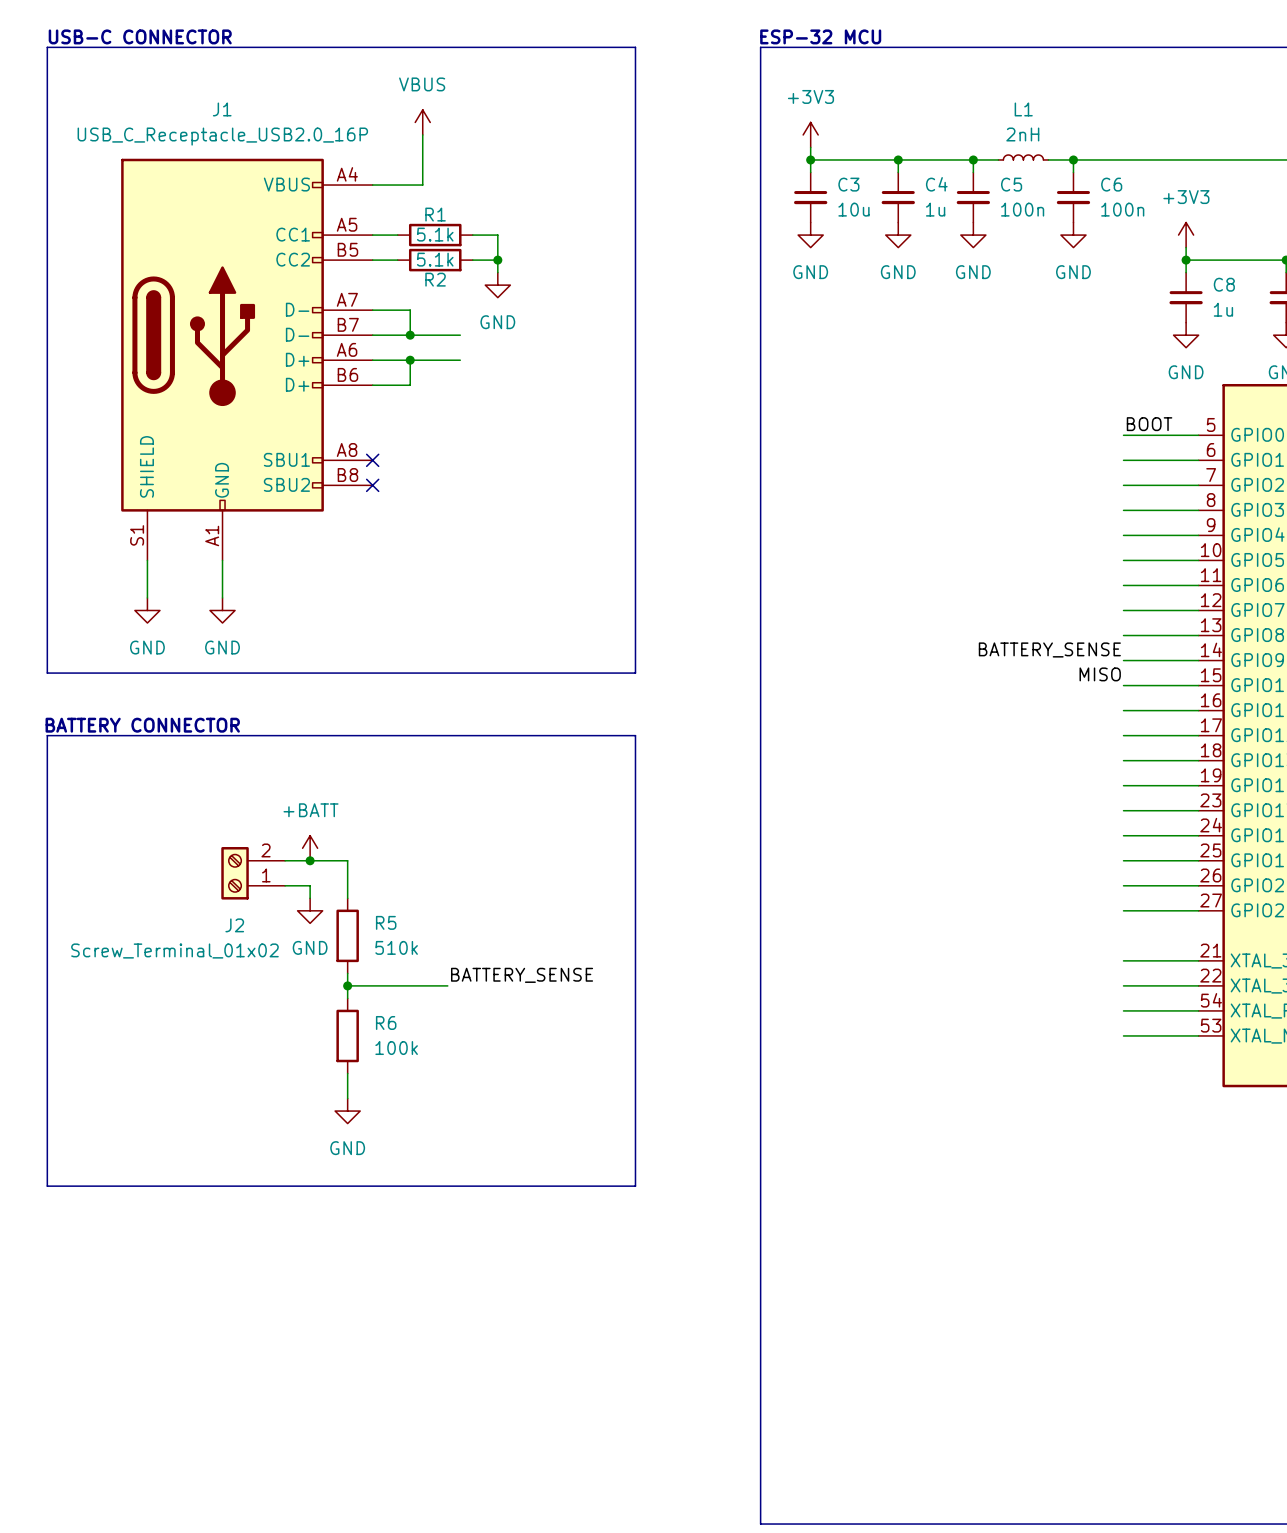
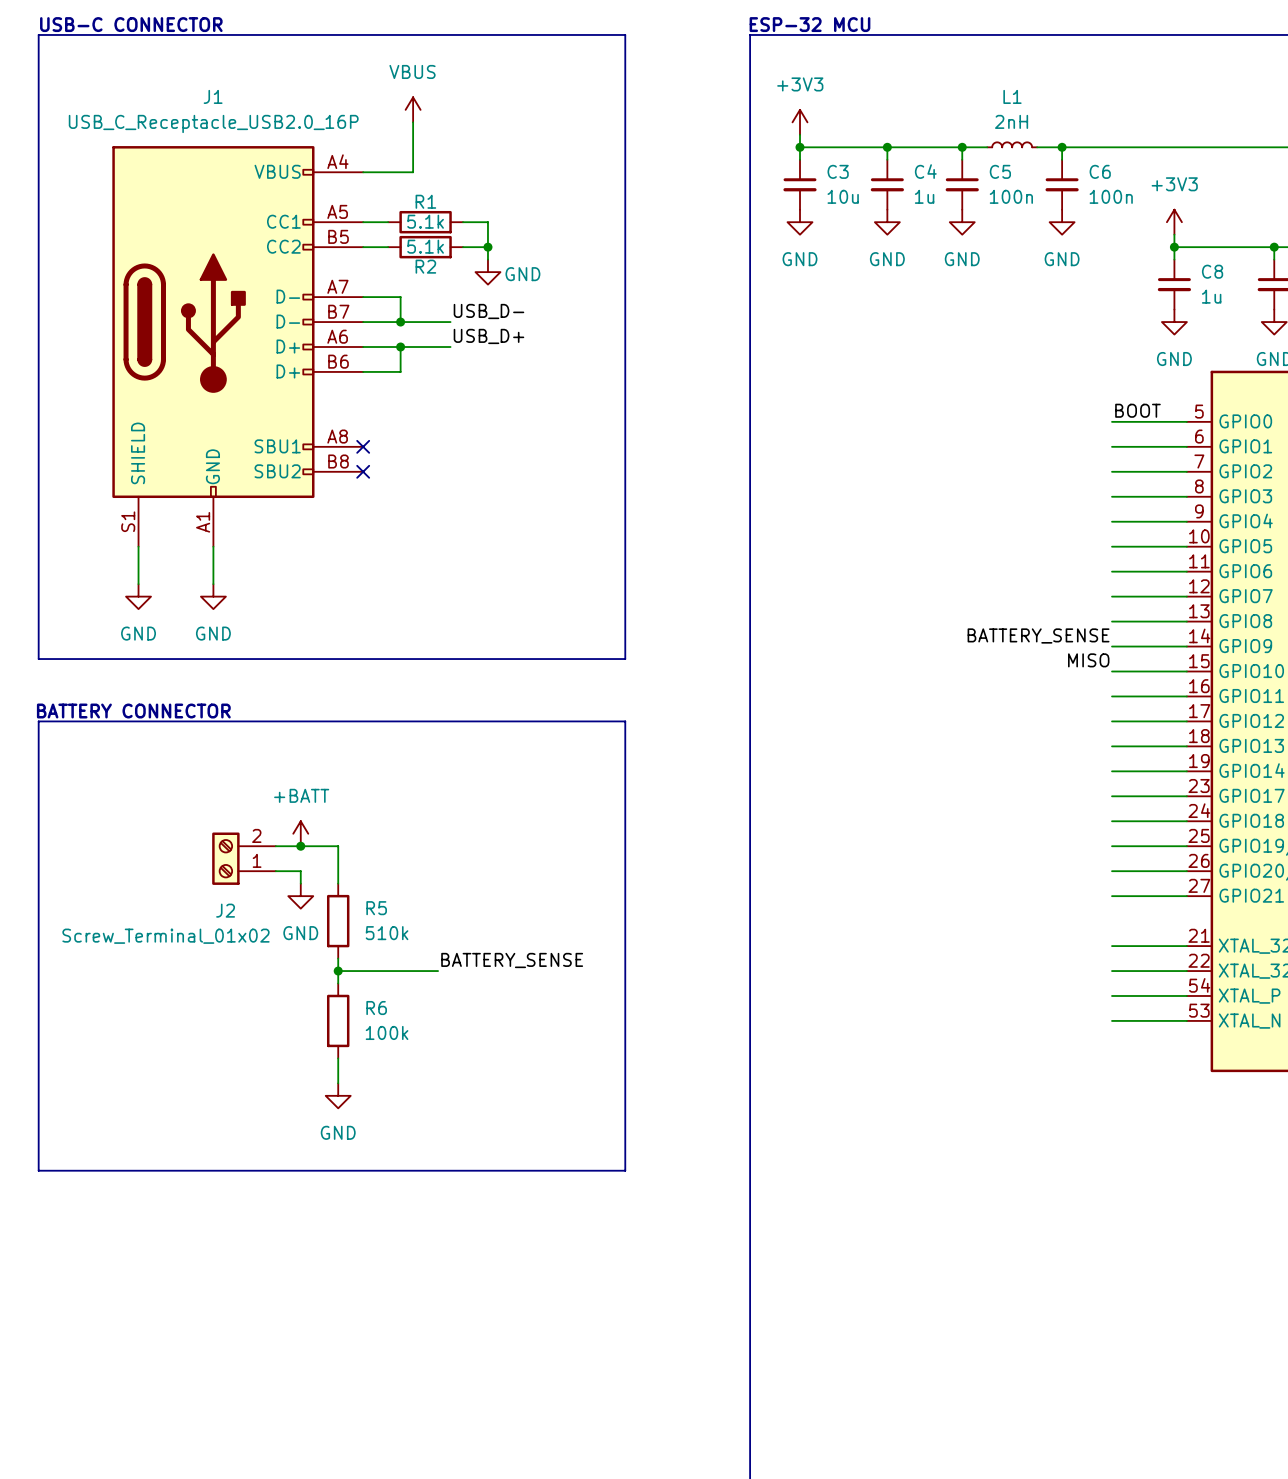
power symbol text position: GND (497, 322) -> GND (522, 274)
label: none -> USB_D- (488, 311)
label: none -> USB_D+ (488, 336)

